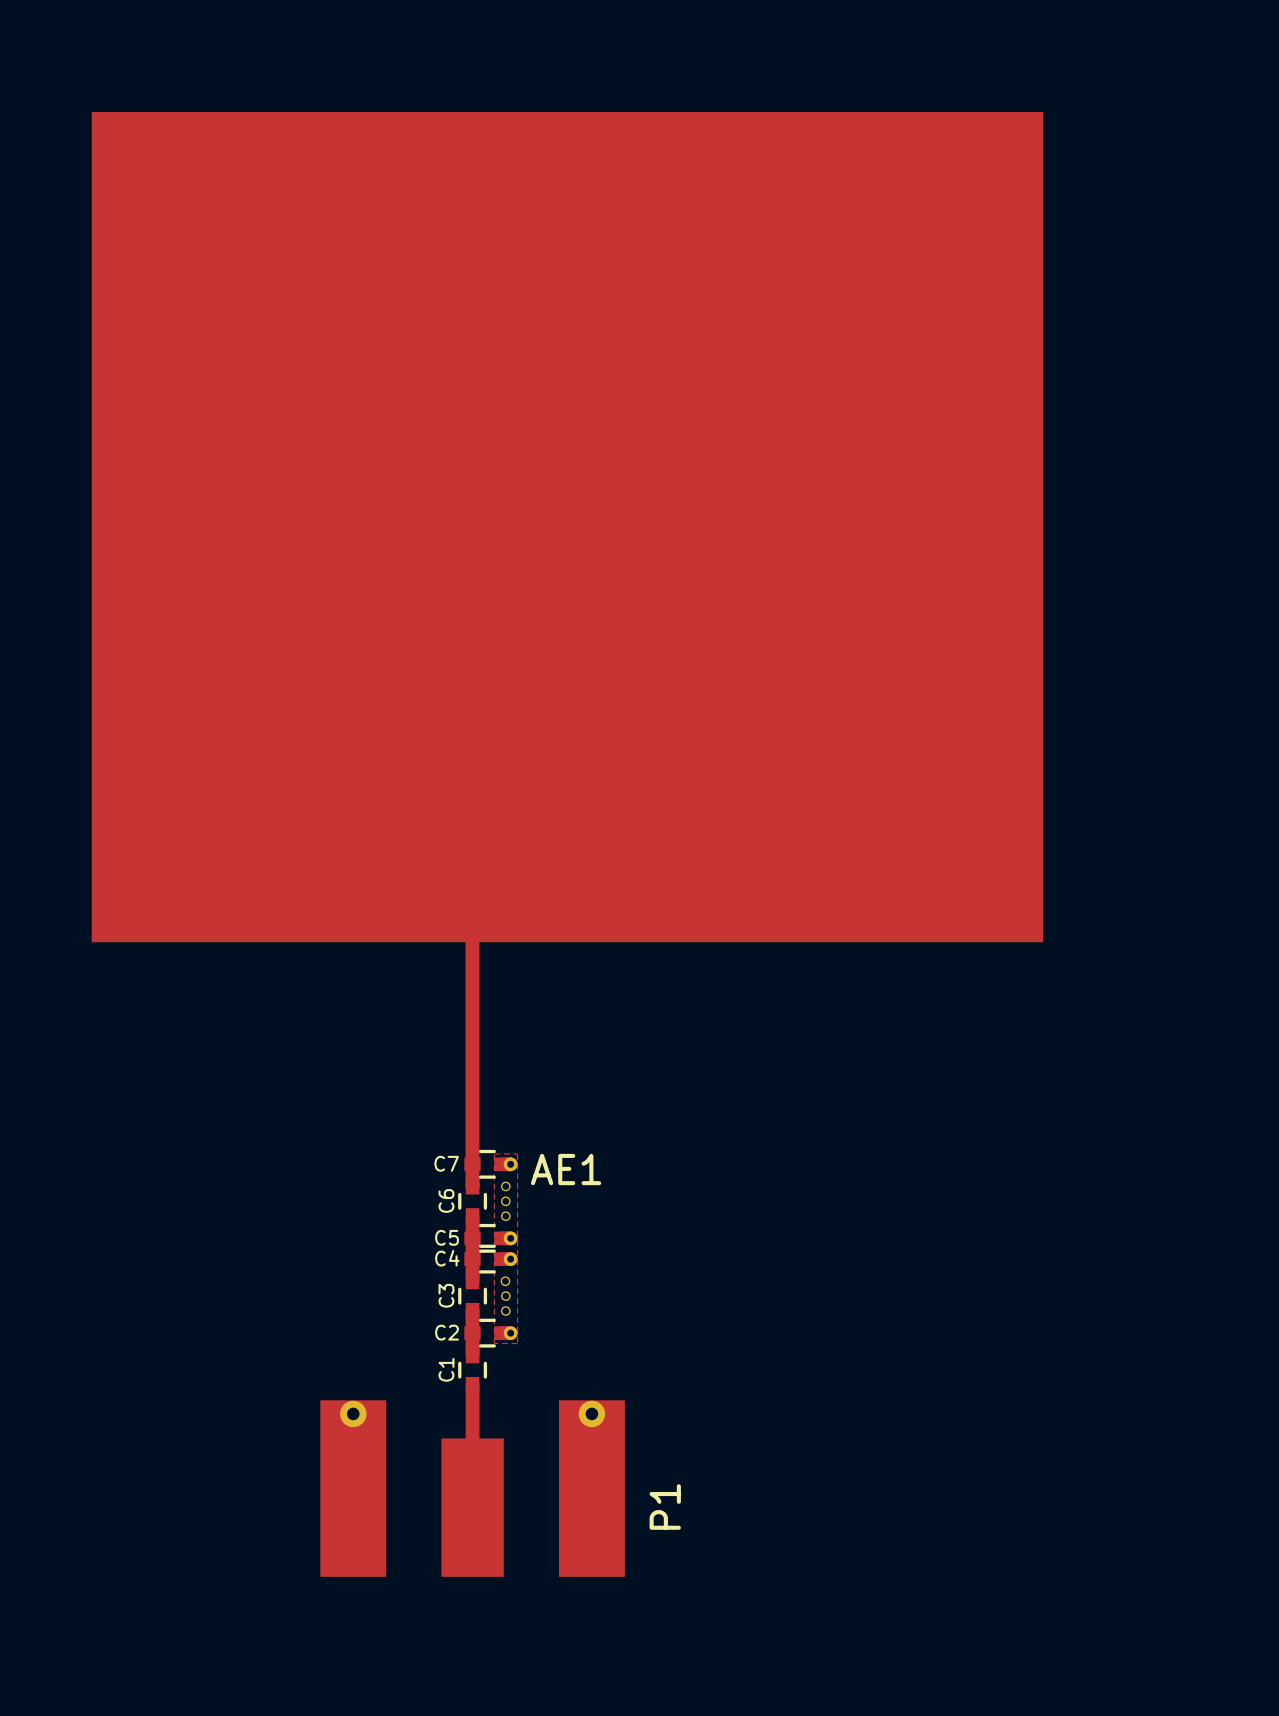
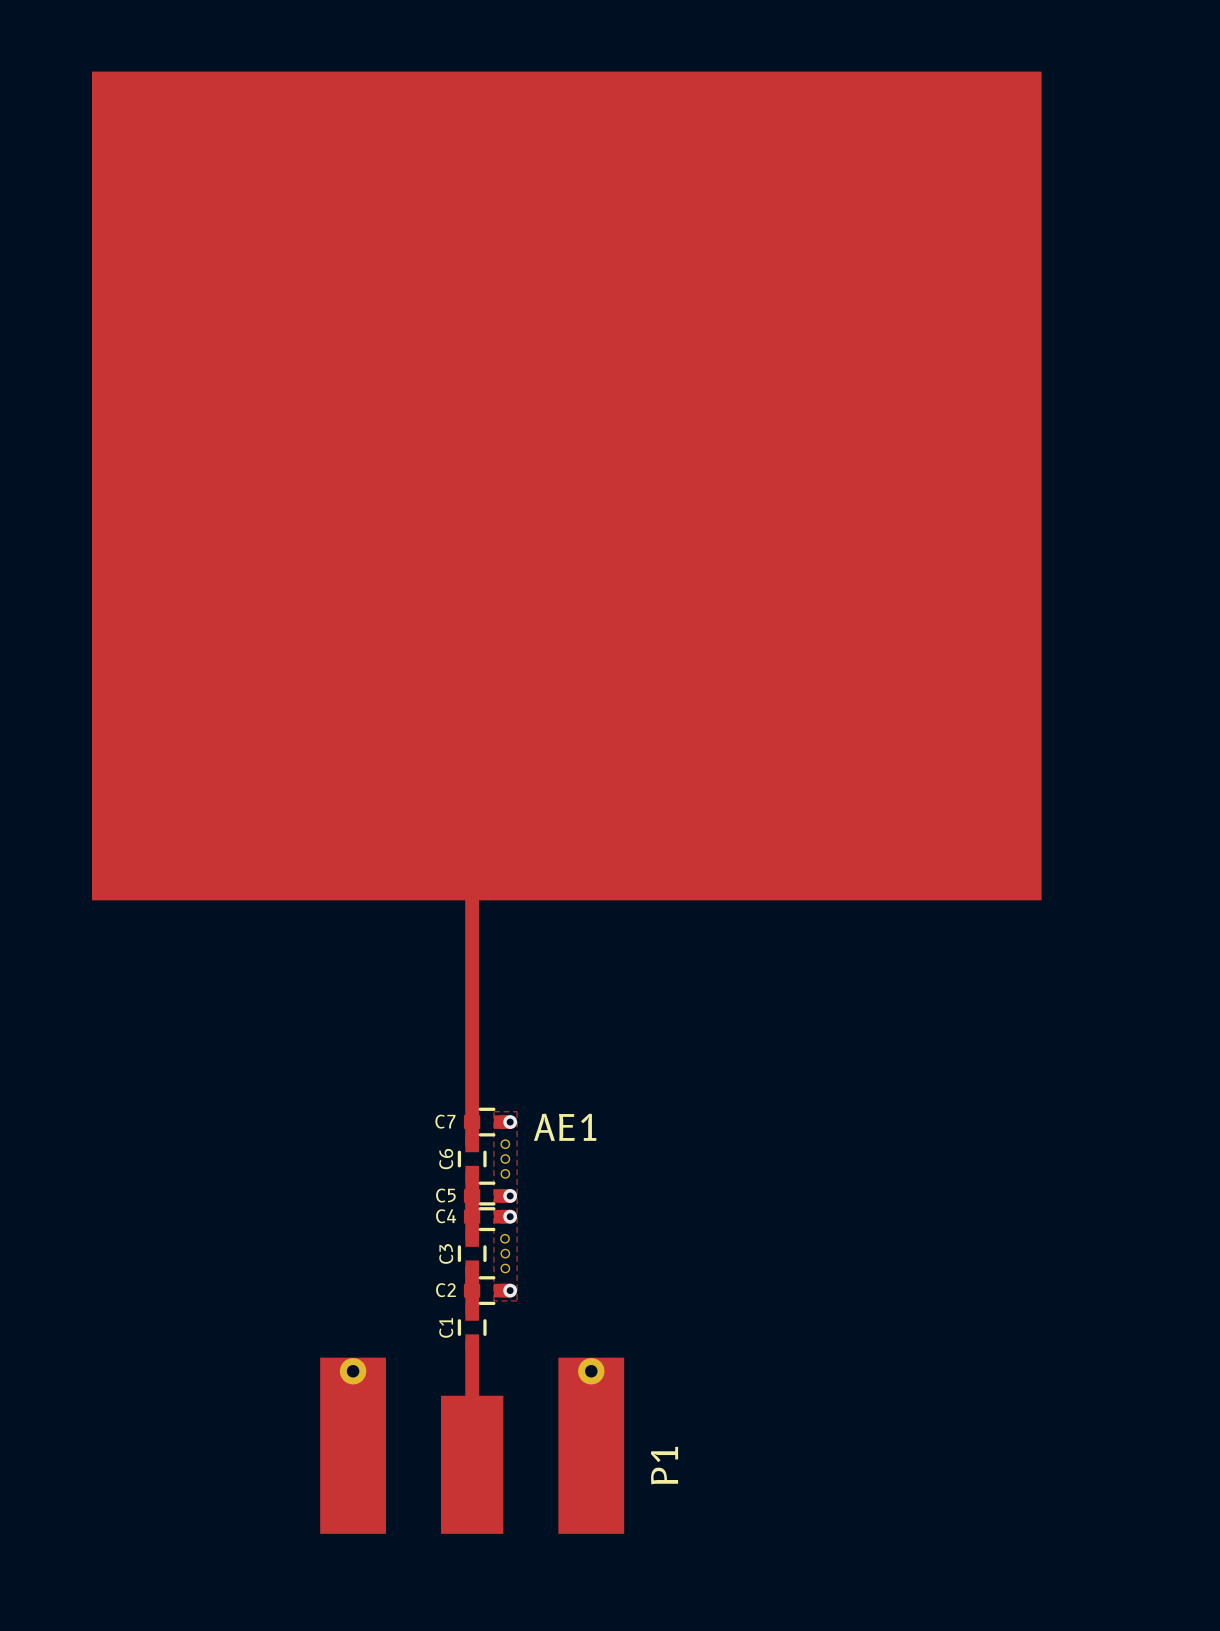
part: (510, 1164) -> none
via: none -> (510, 1122)
part: (510, 1238) -> none
via: none -> (510, 1195)
part: (510, 1259) -> none
via: none -> (510, 1216)
part: (510, 1333) -> none
via: none -> (510, 1290)

